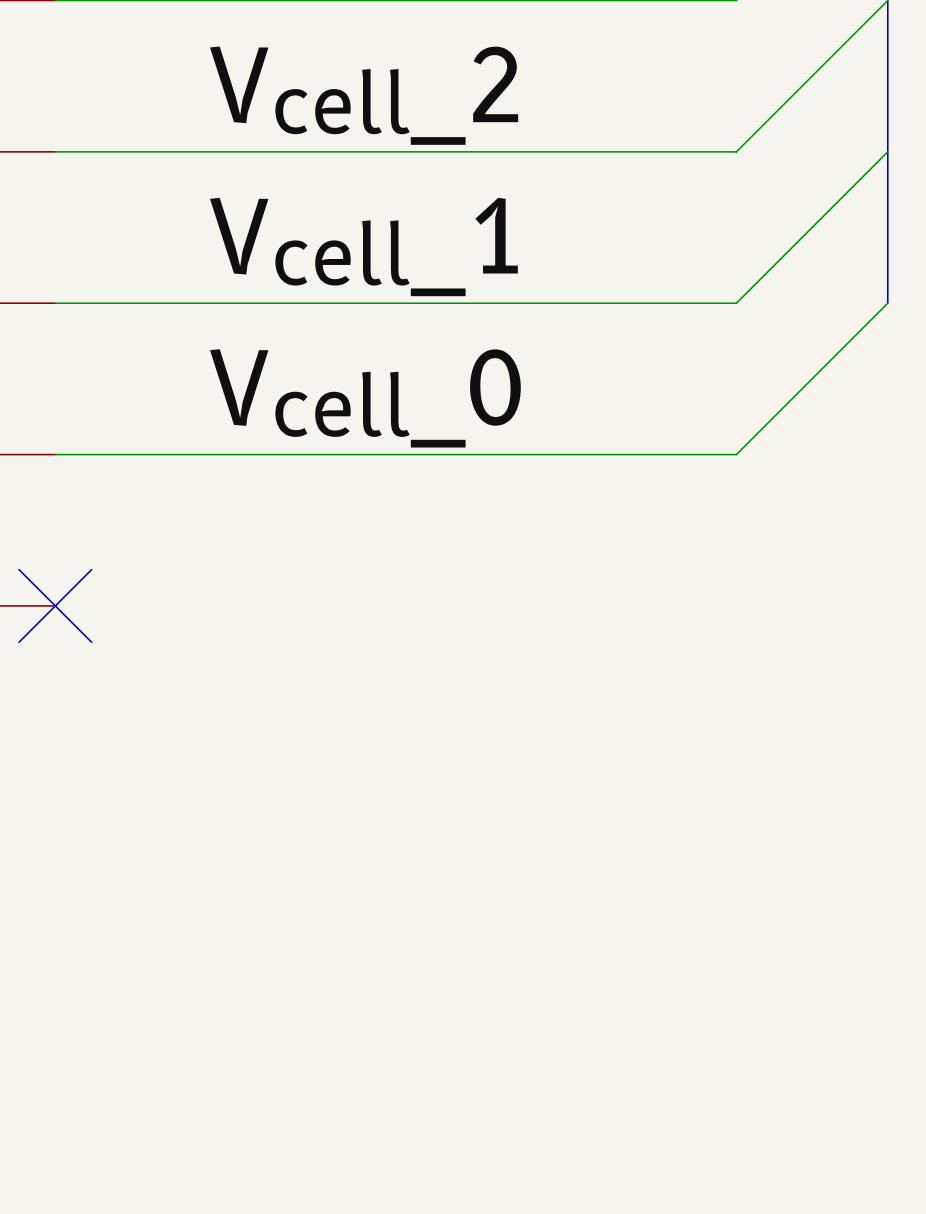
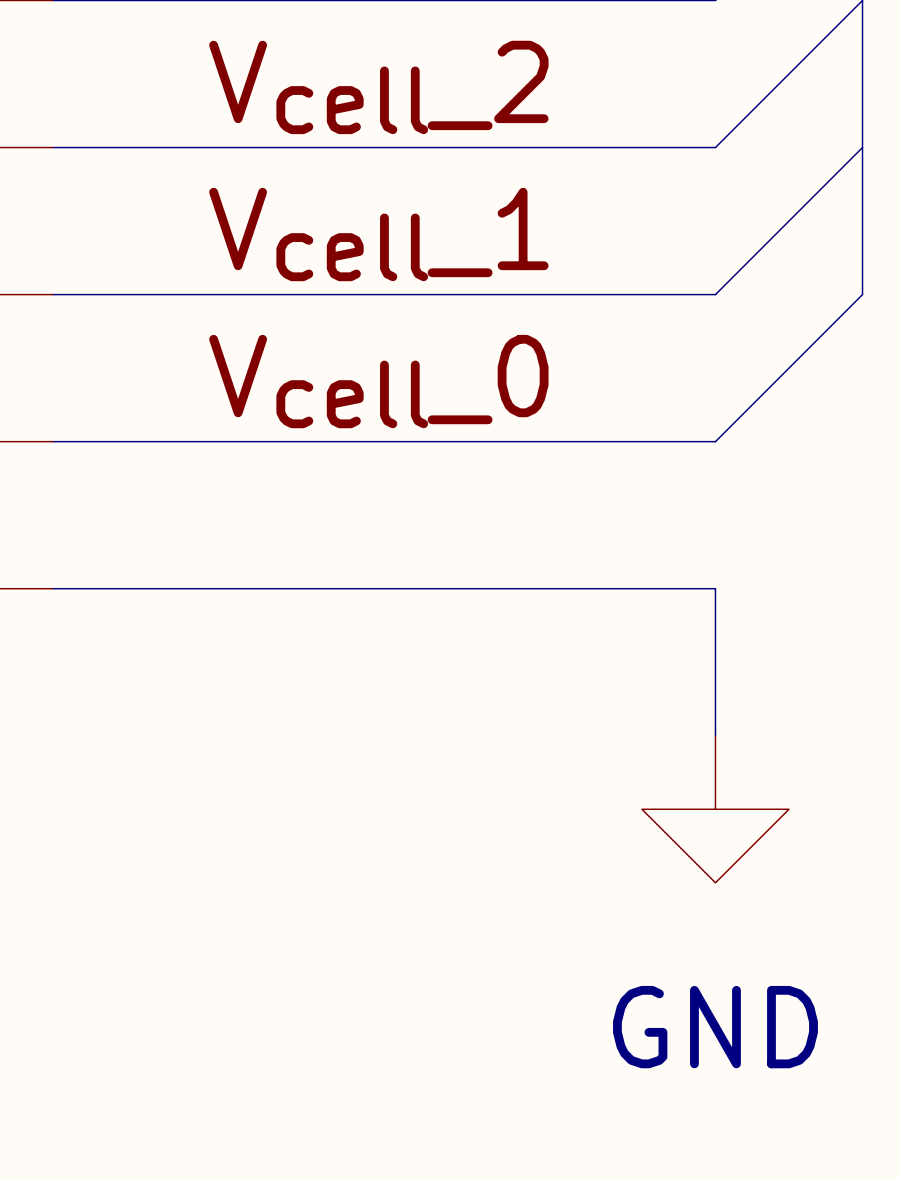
wire: none -> (53, 588) (715, 588) (715, 735)
no-connect mark: (55, 605) -> none
power symbol: none -> GND (715, 809)

